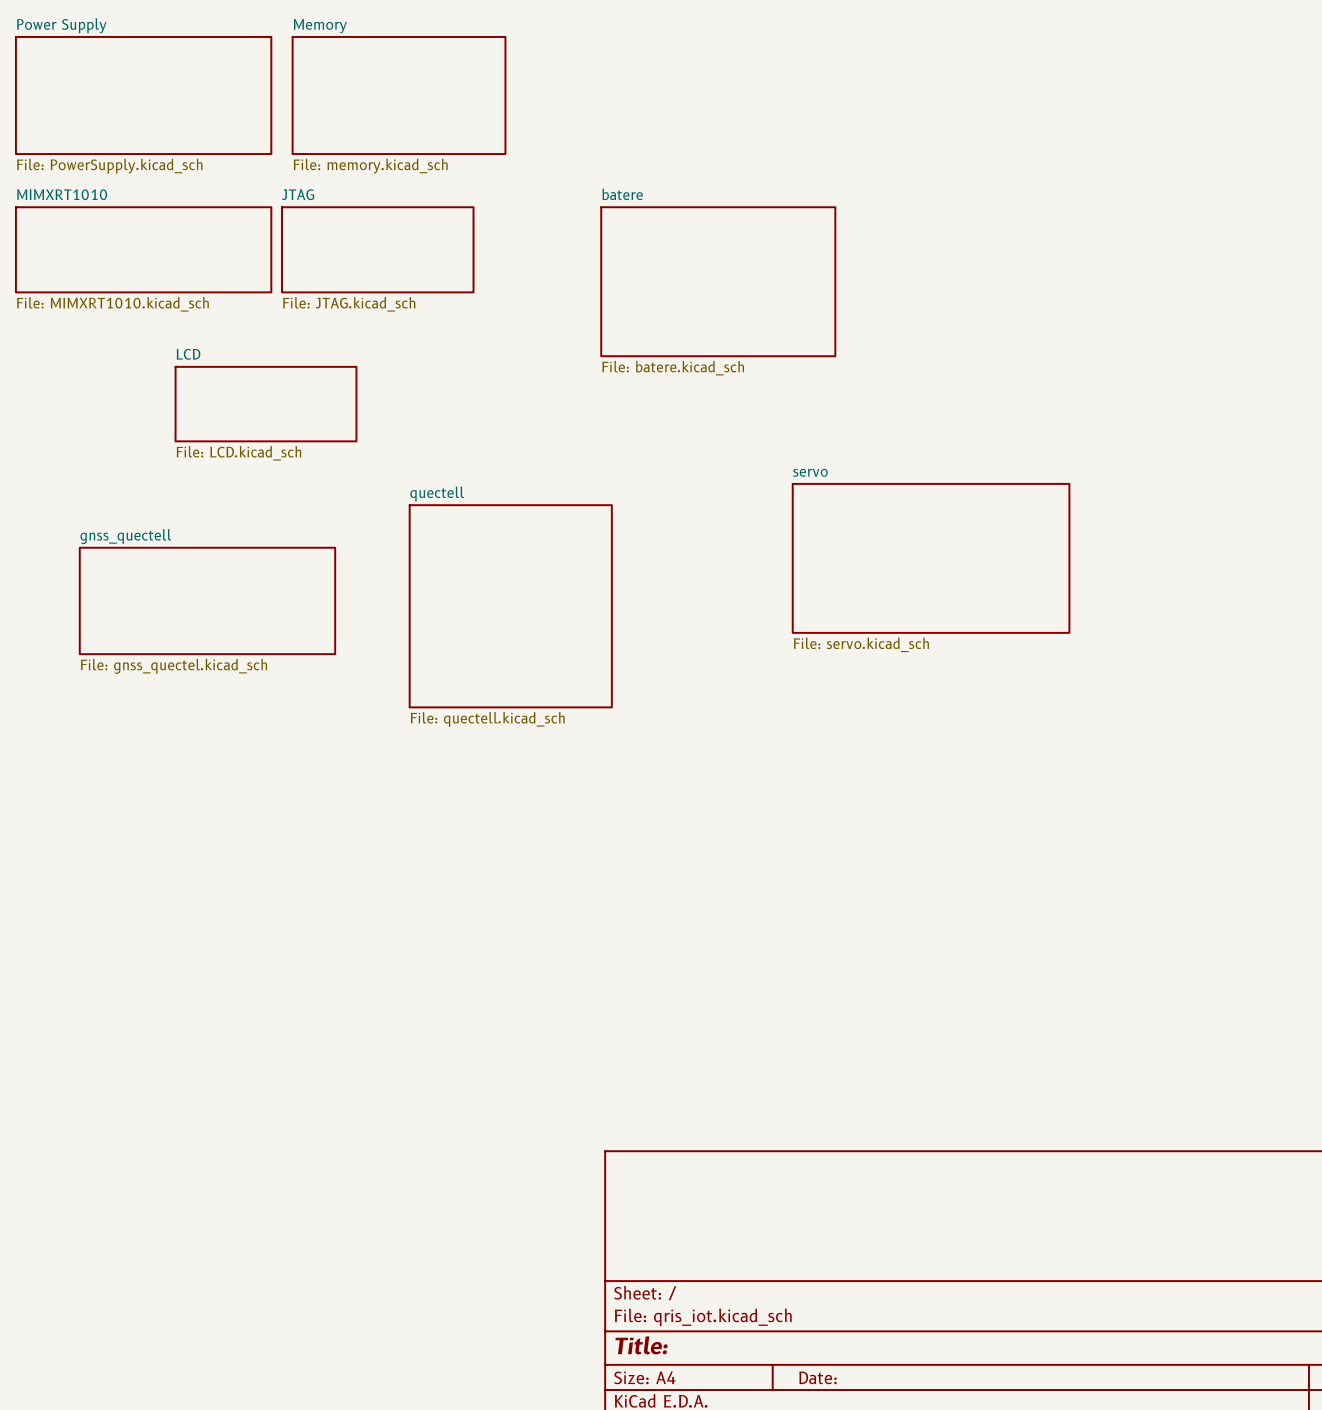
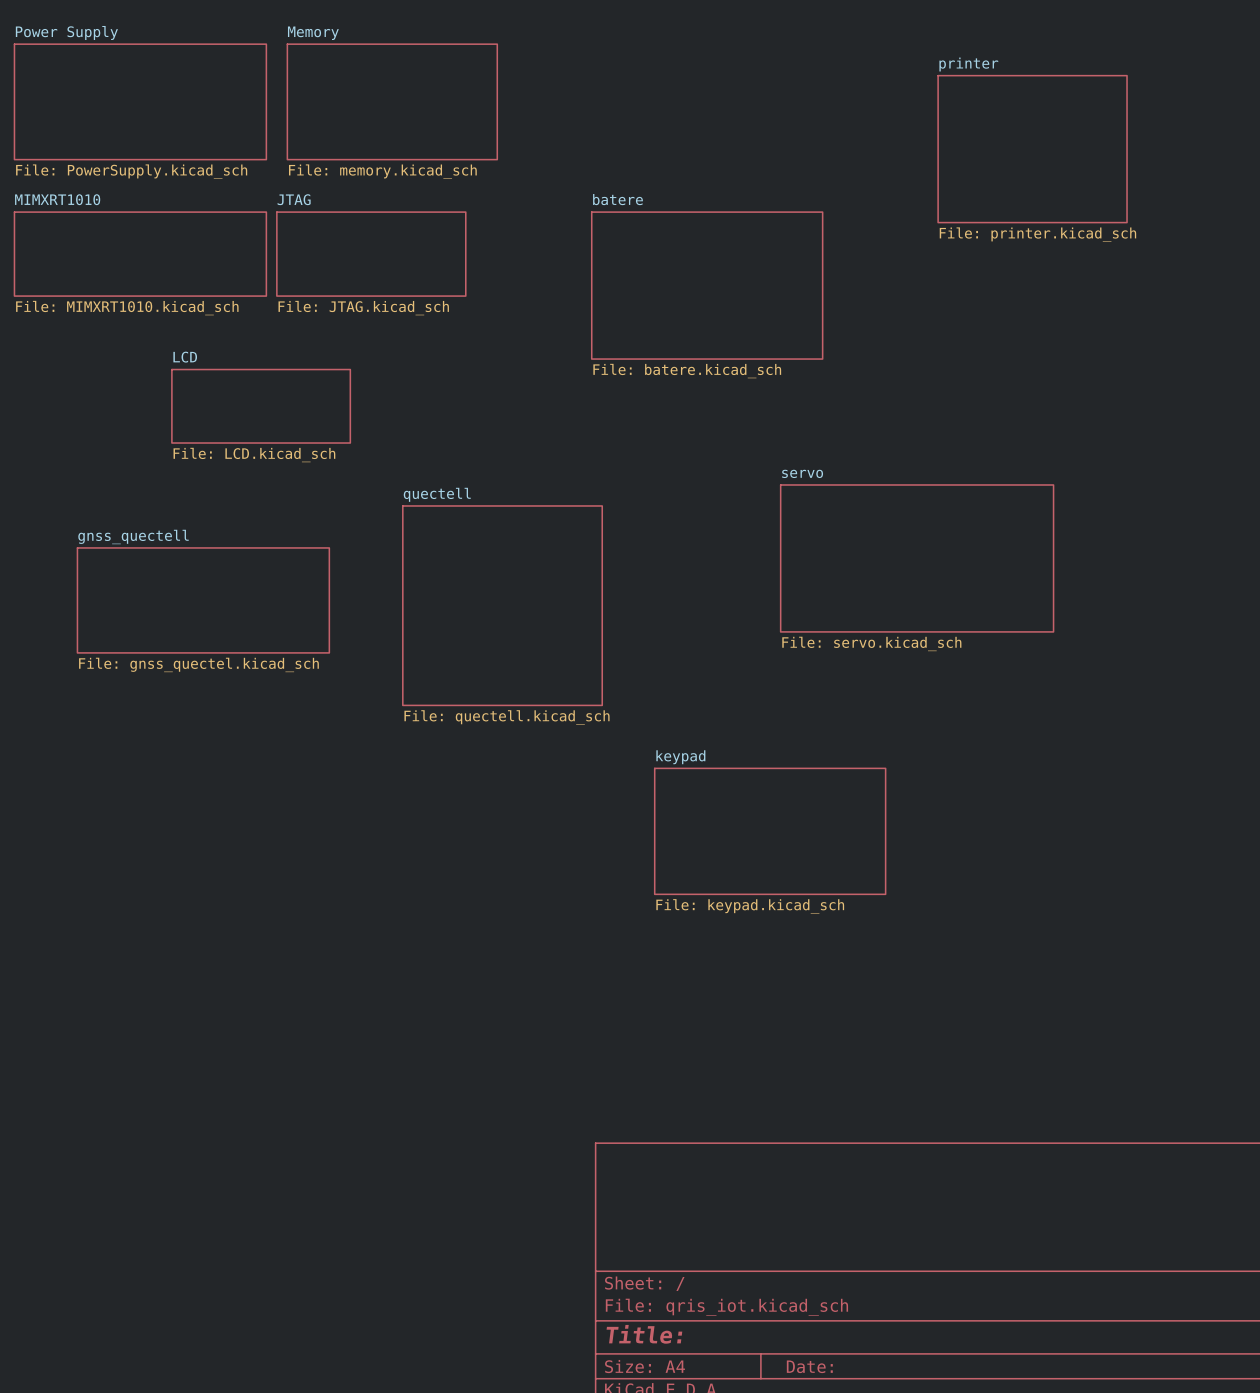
sheet printer: none -> File: printer.kicad_sch (1032, 149)
sheet keypad: none -> File: keypad.kicad_sch (770, 831)

